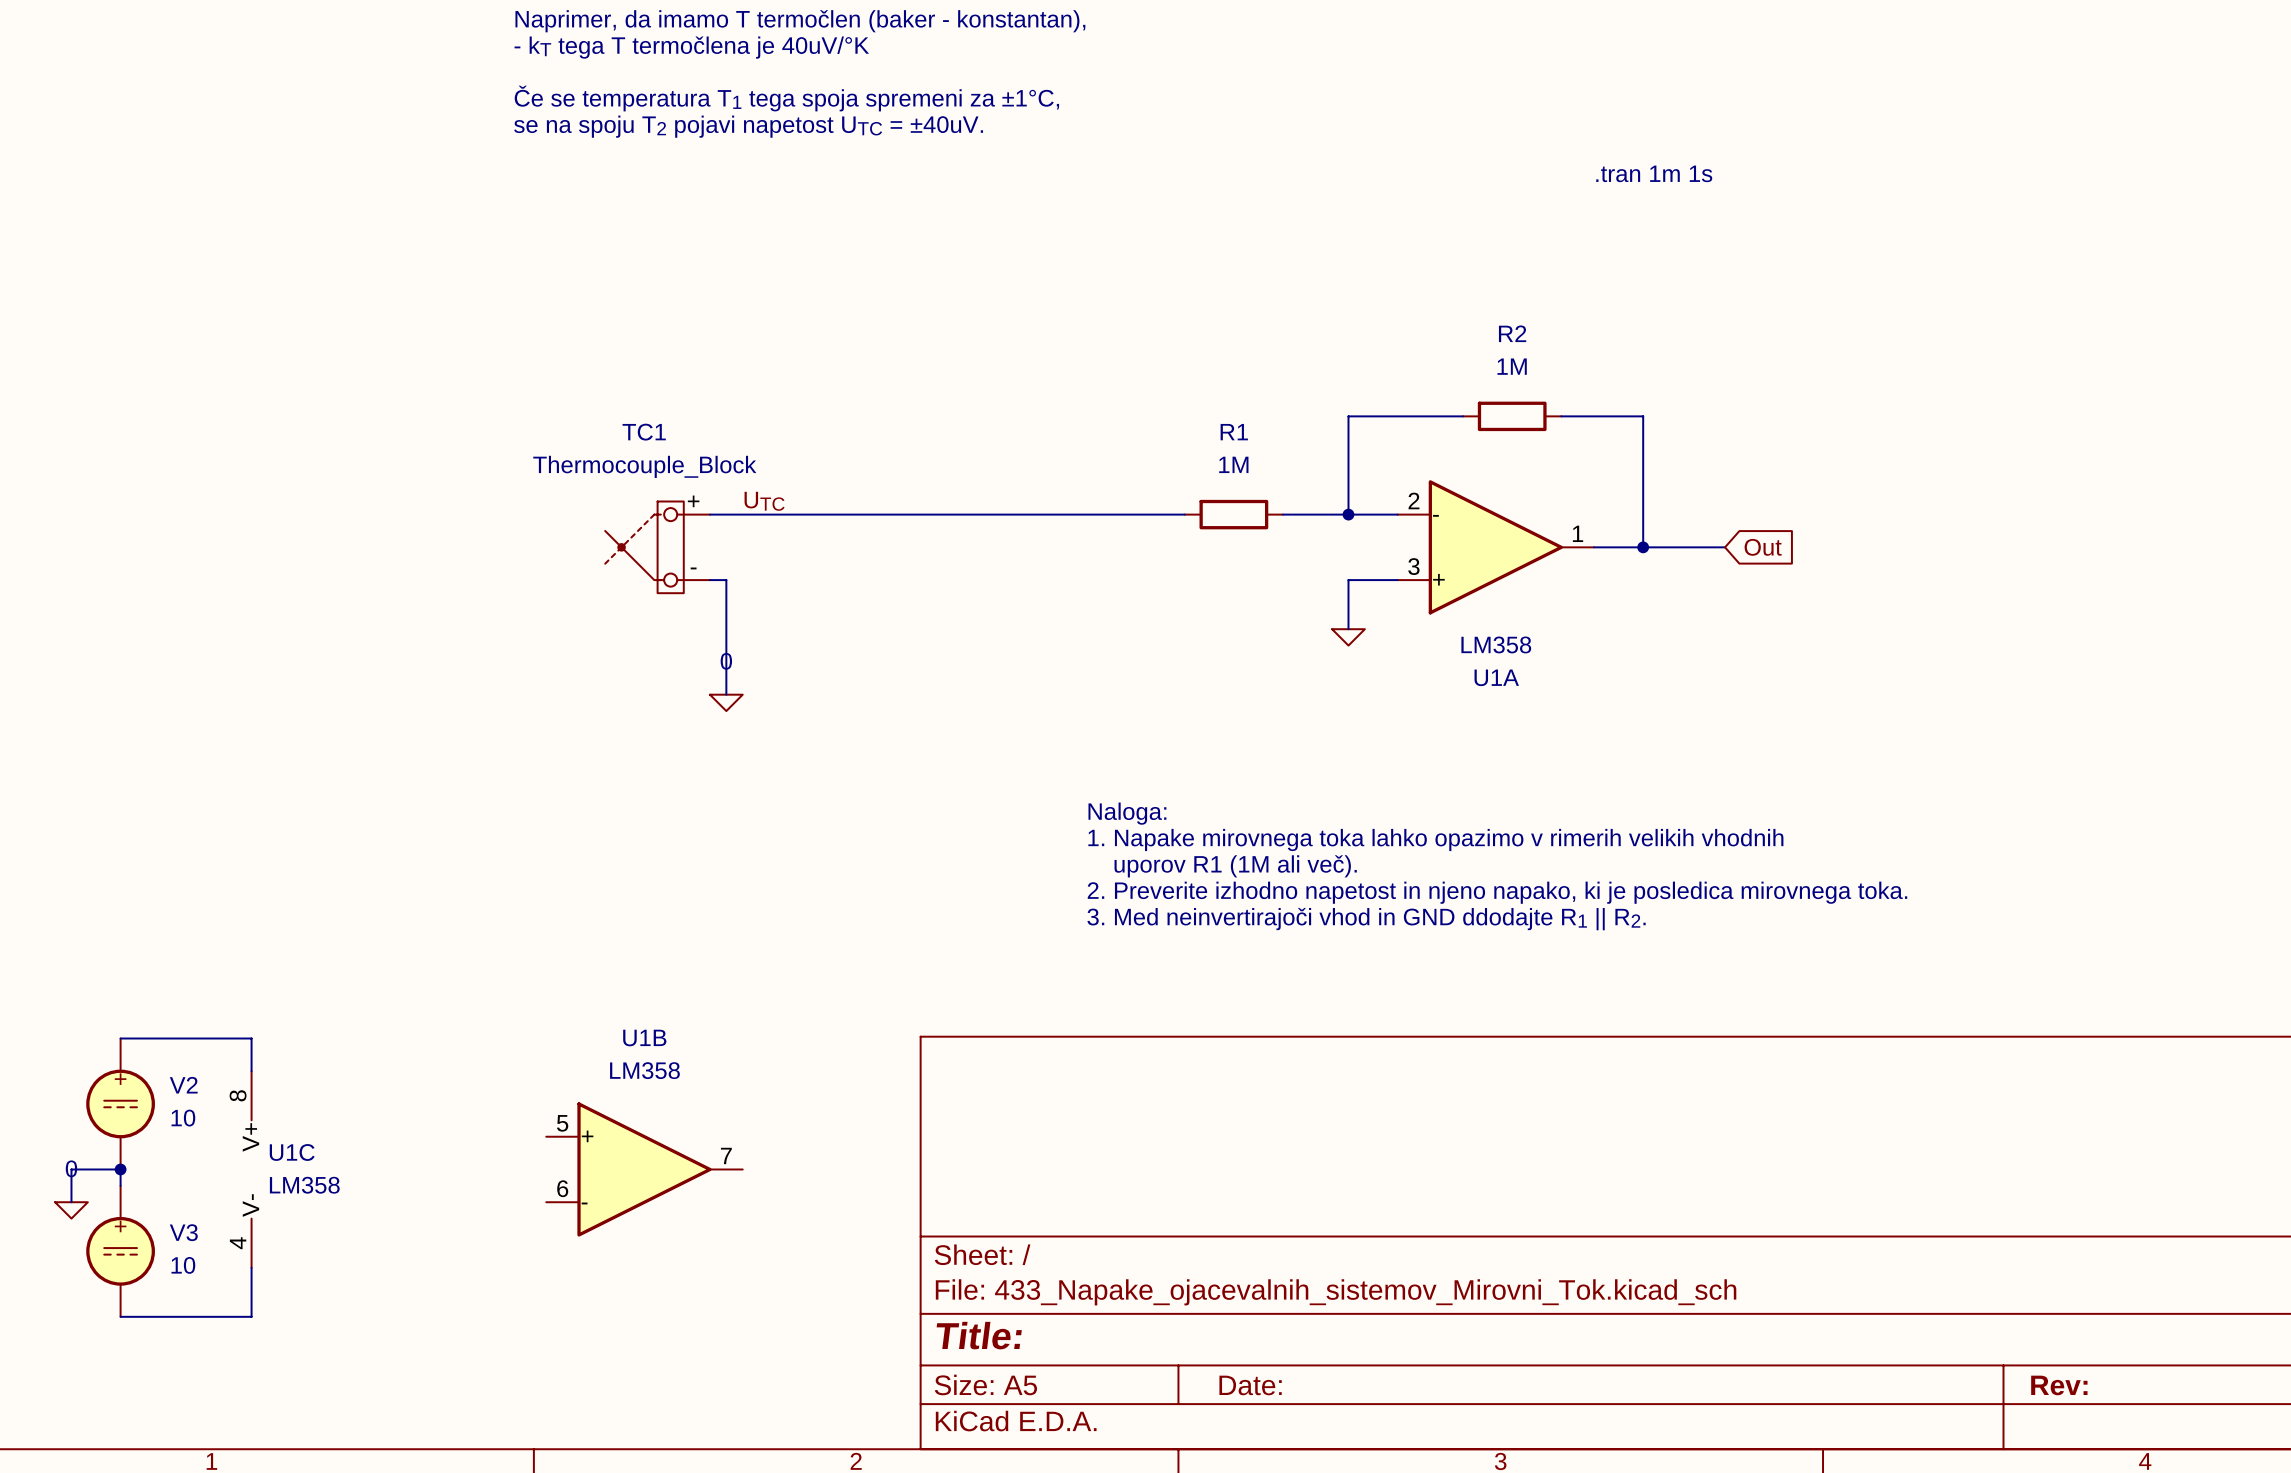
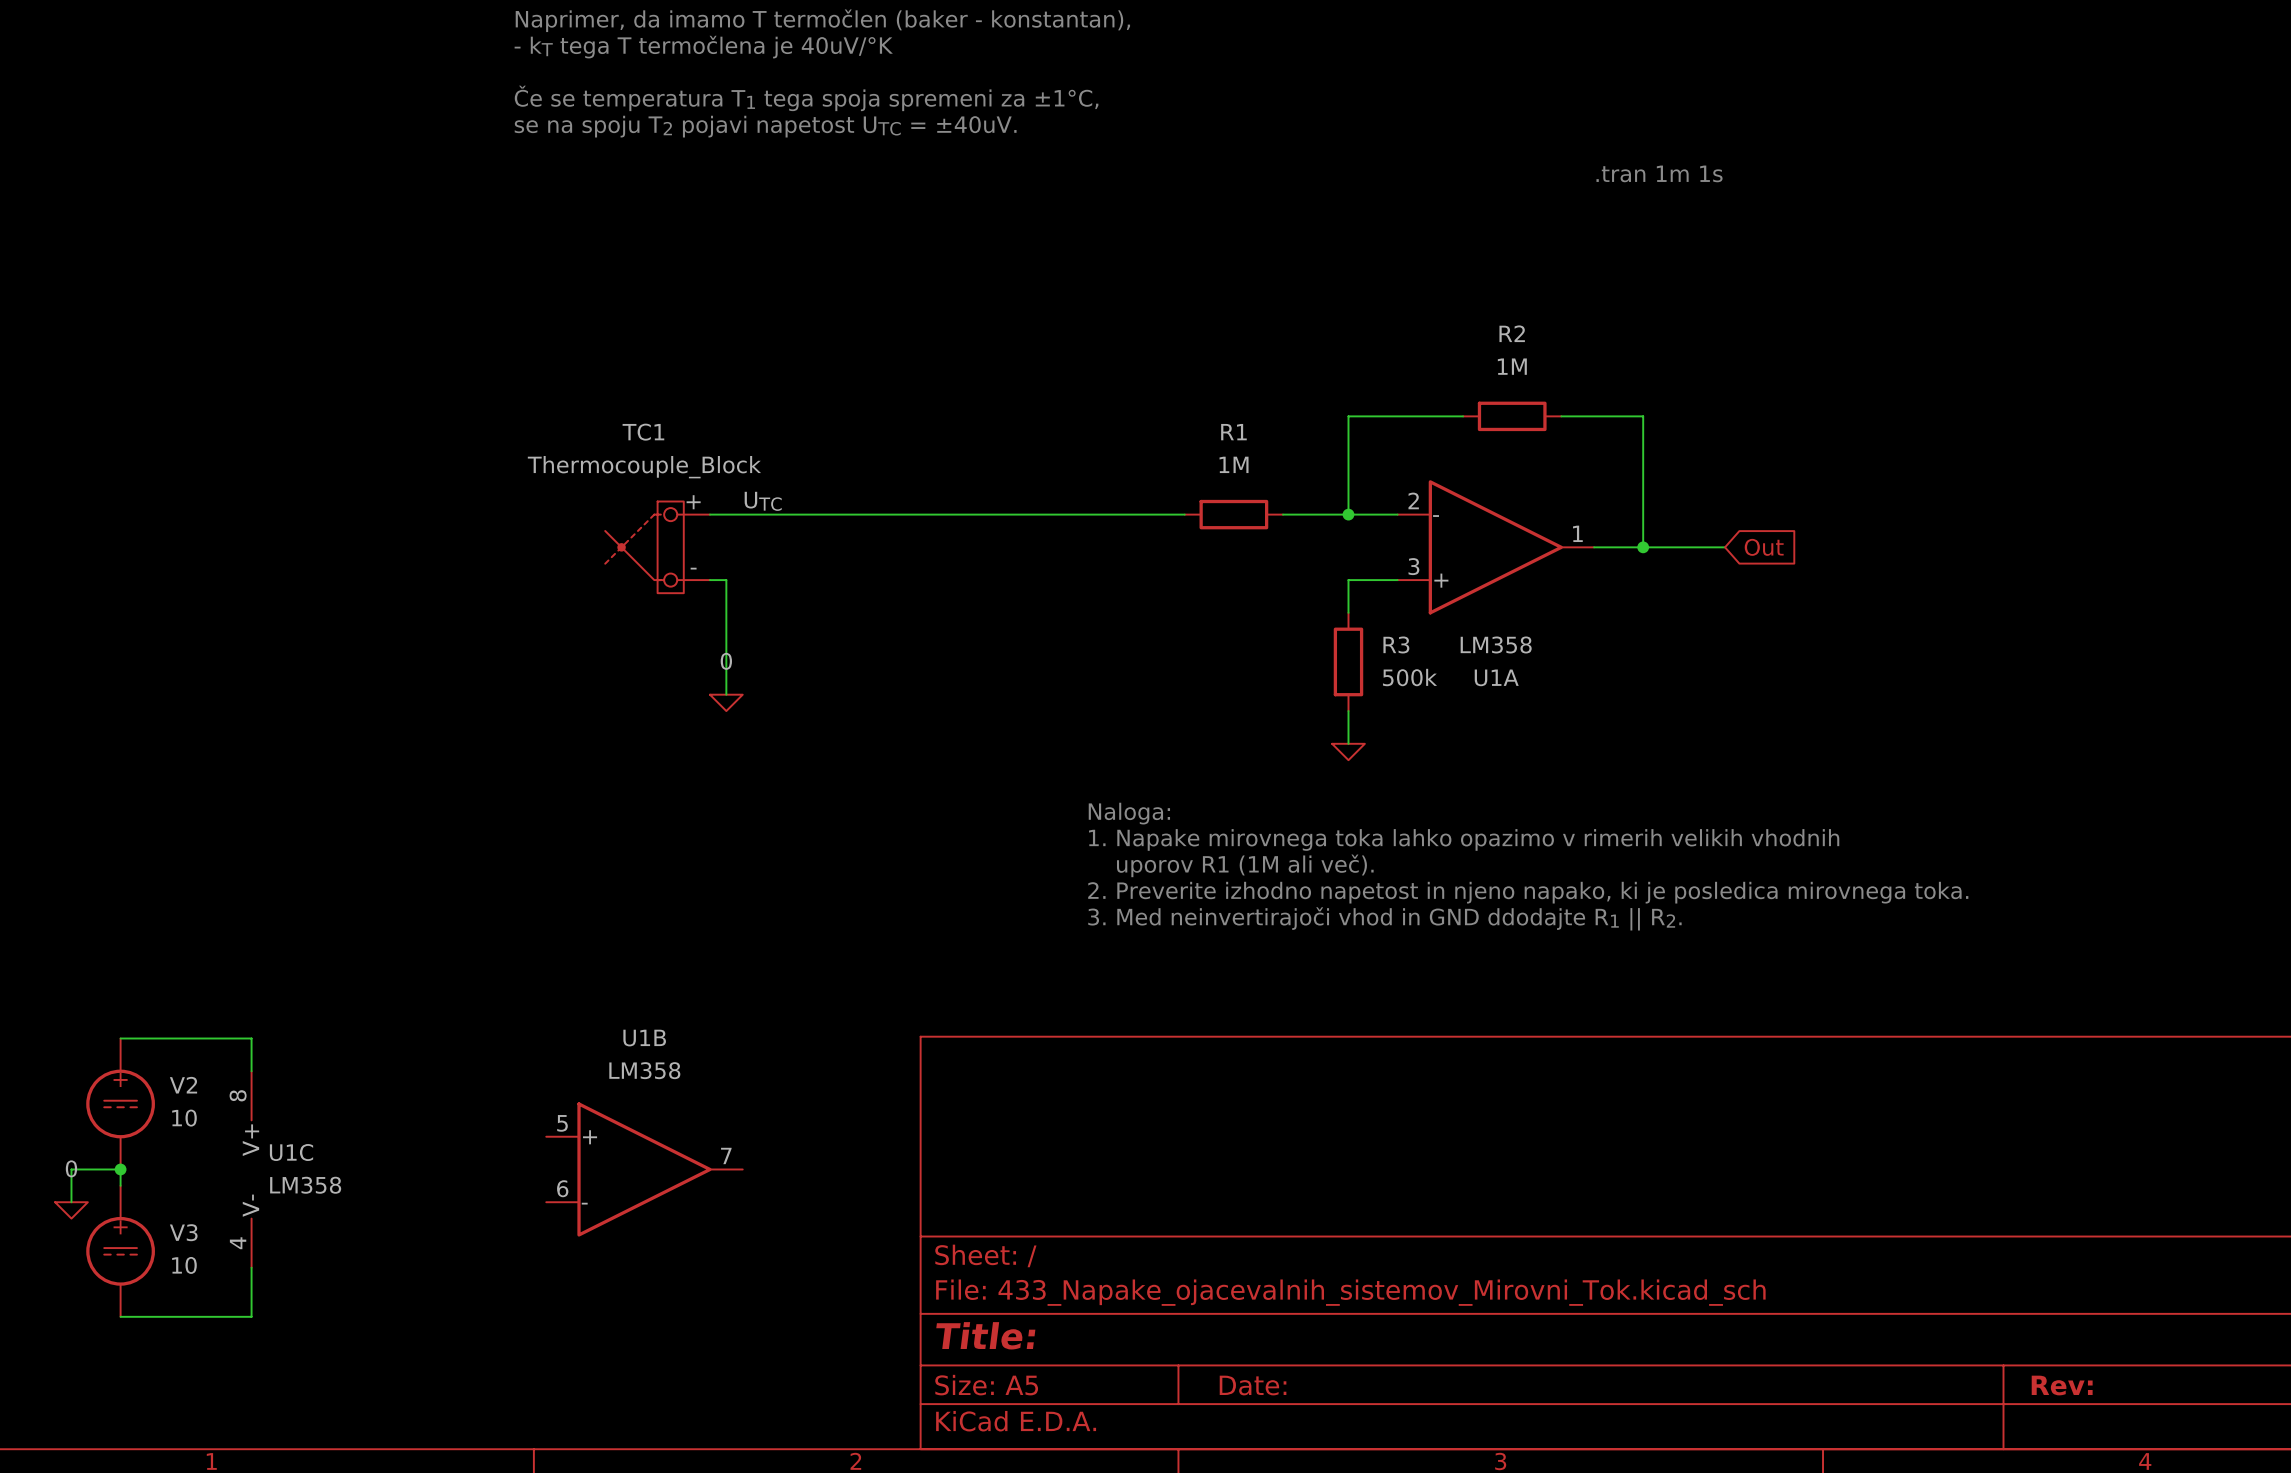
power symbol position: (1348, 637) -> (1348, 751)
R3: none -> 500k (1348, 661)
wire: none -> (1348, 711) (1348, 743)

